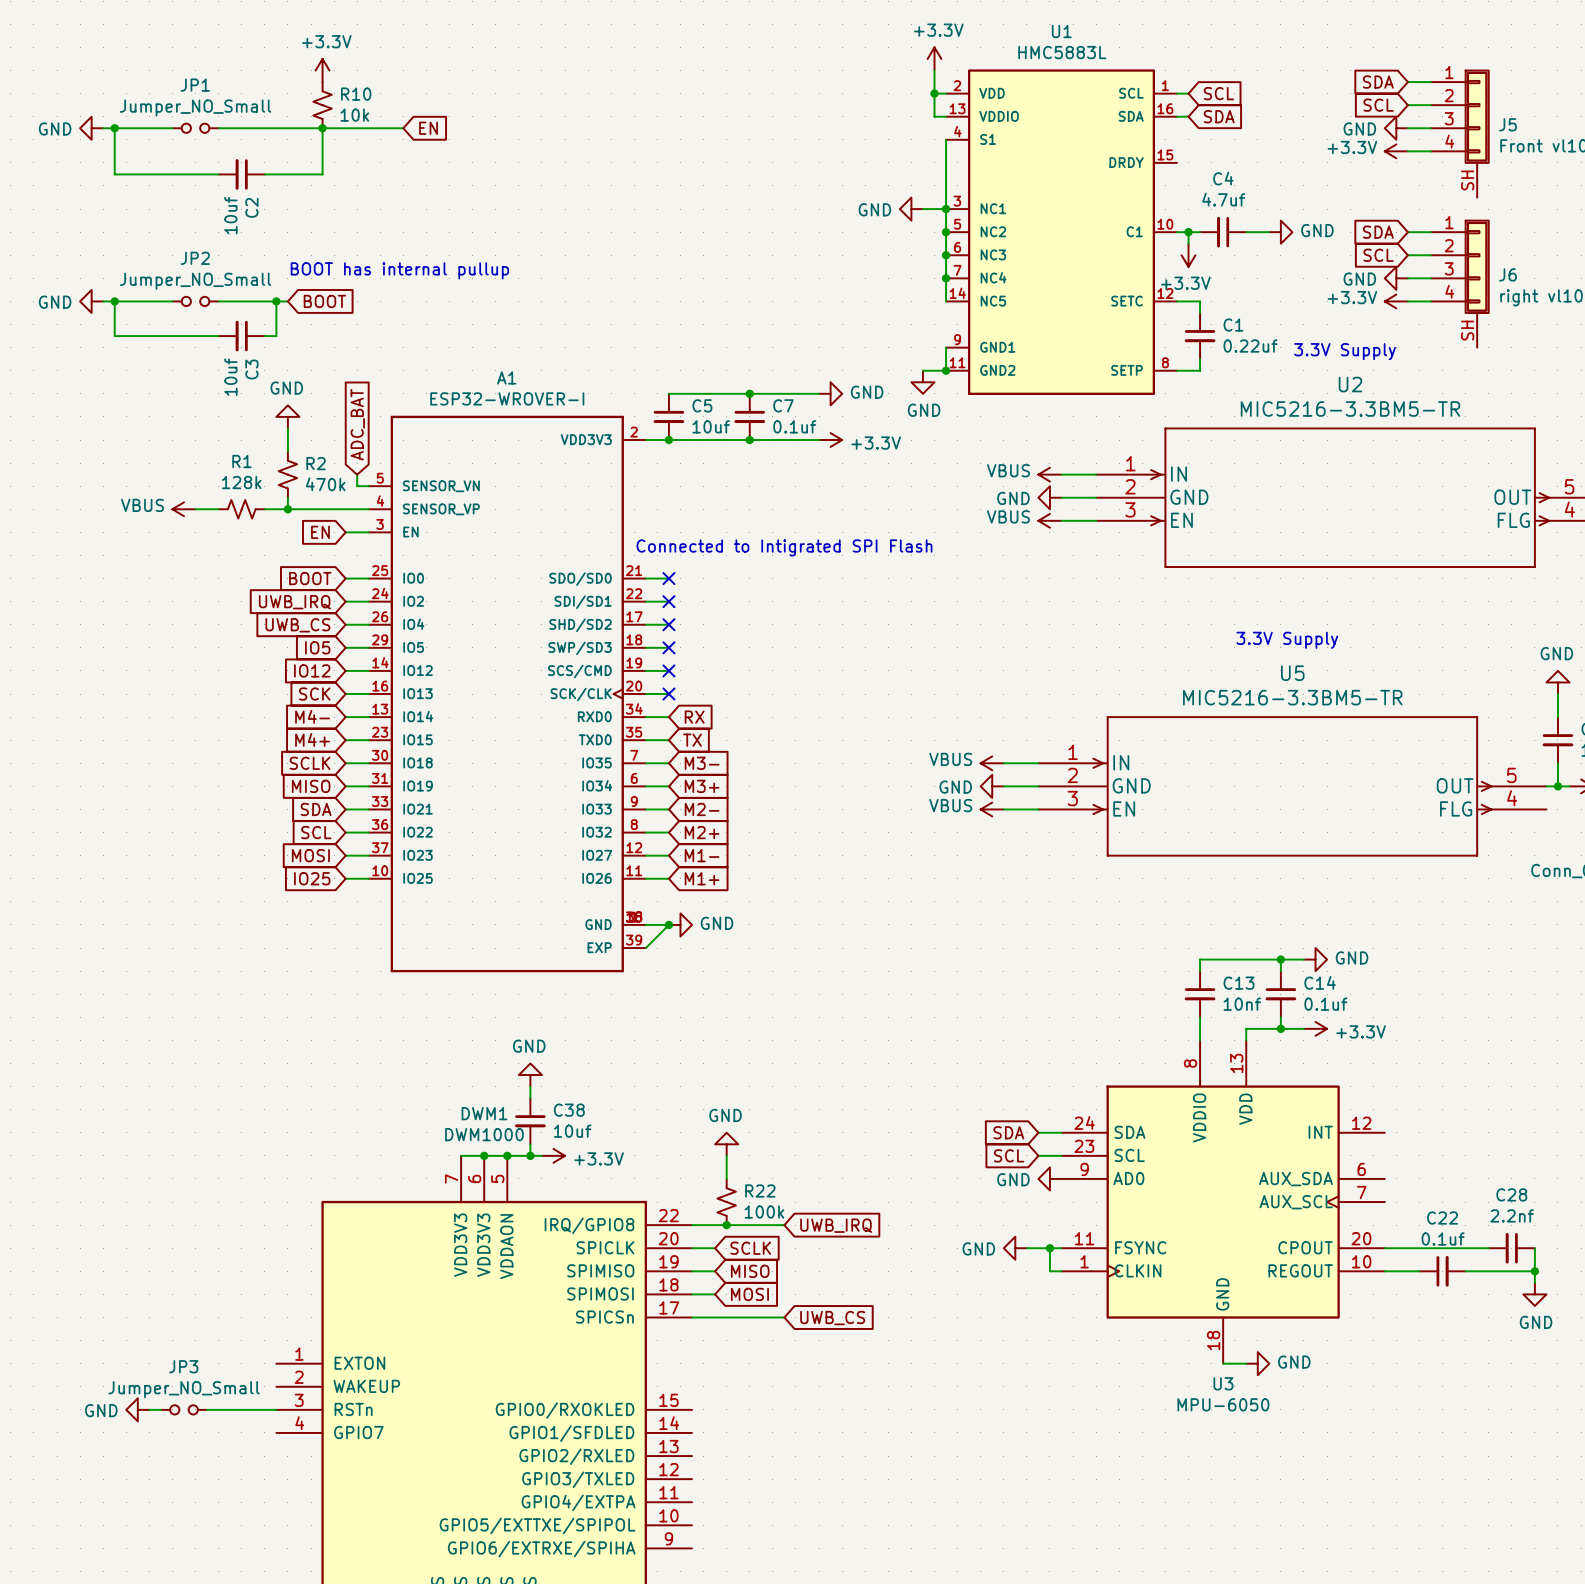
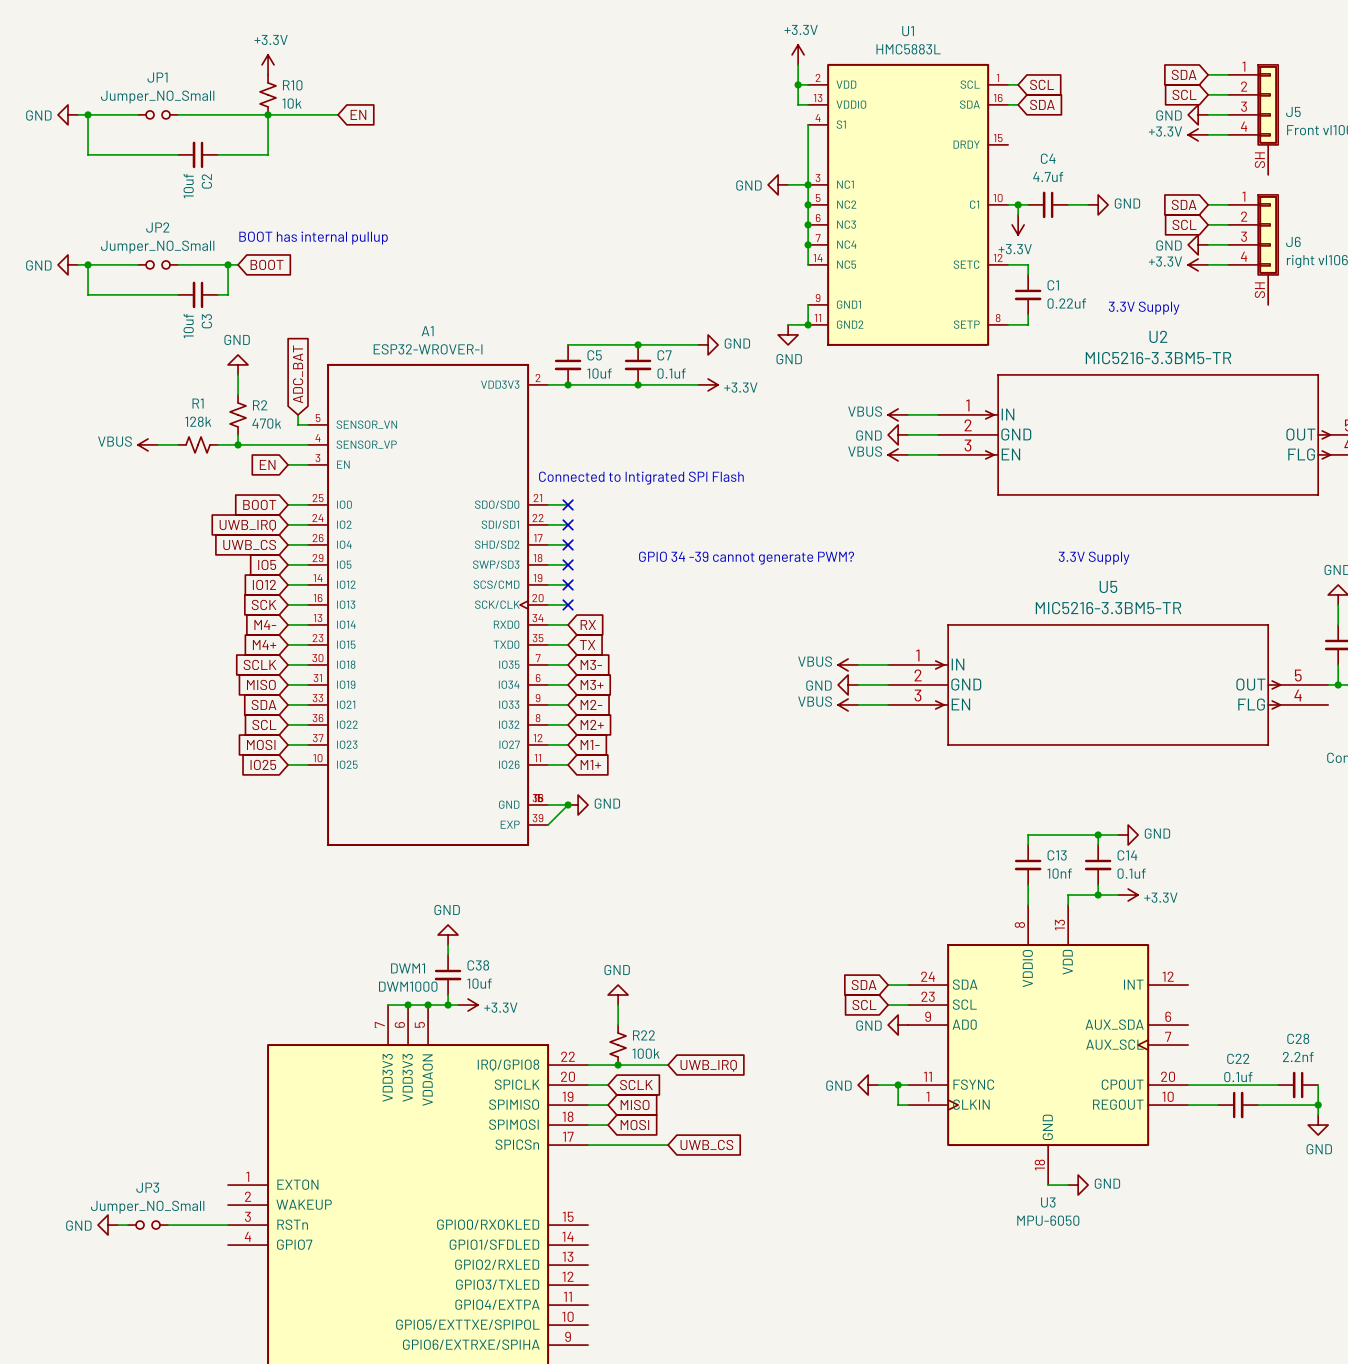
text: none -> GPIO 34 -39 cannot generate PWM? (746, 558)

